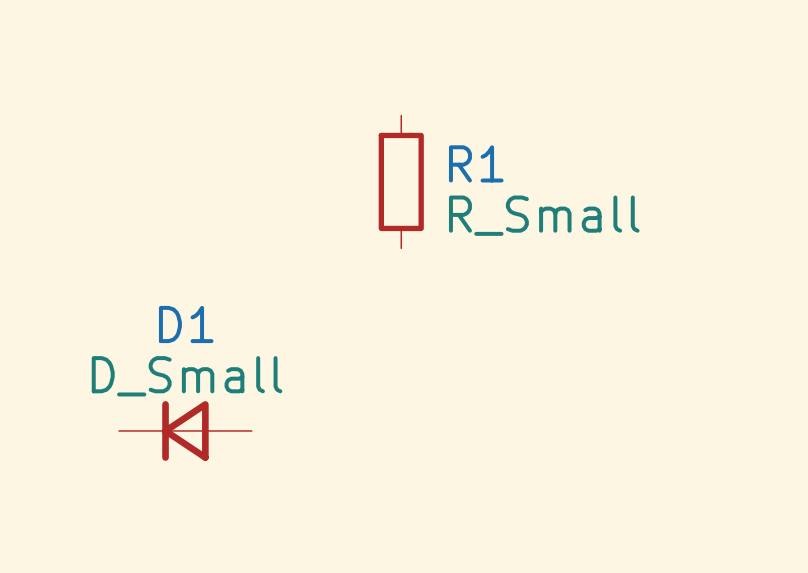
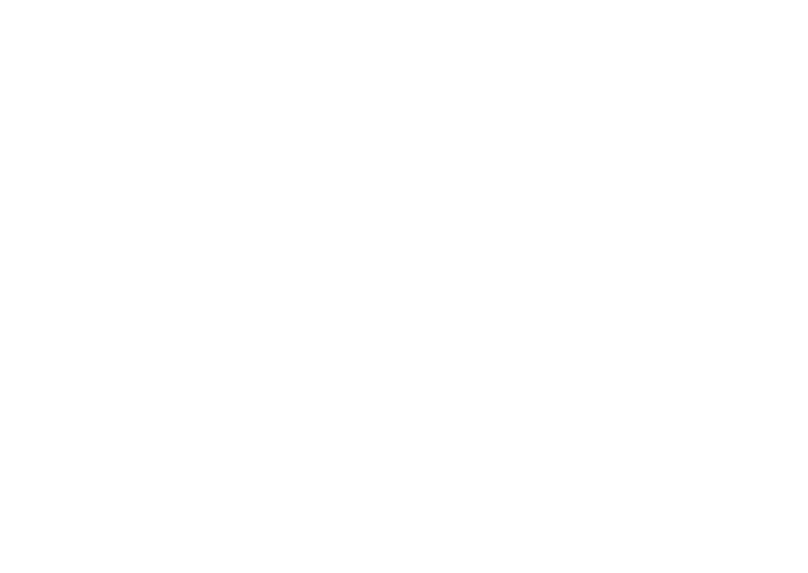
R1: R_Small (401, 181) -> none
D1: D_Small (185, 430) -> none

